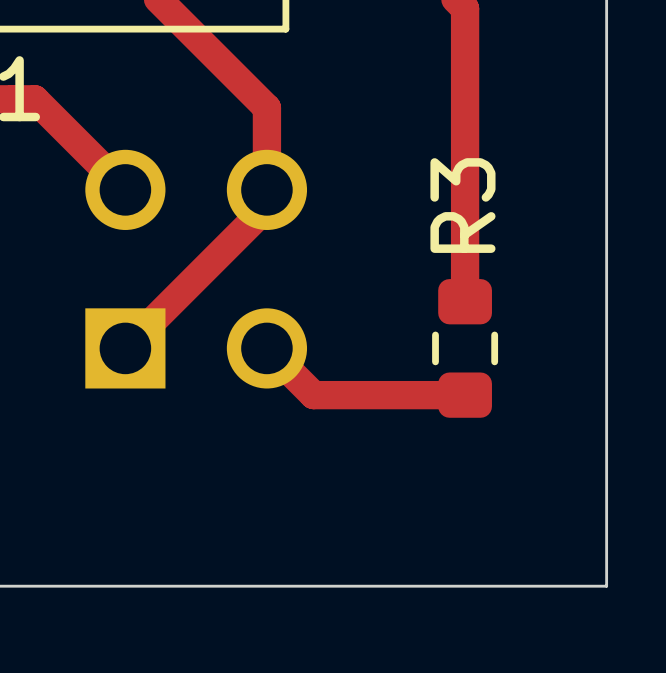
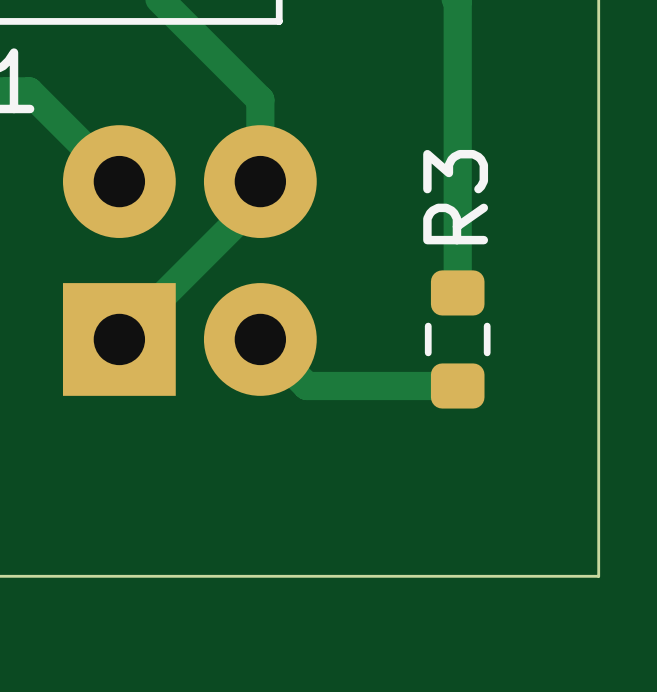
part footprint: [85, 149, 308, 389] -> [62, 125, 317, 396]

